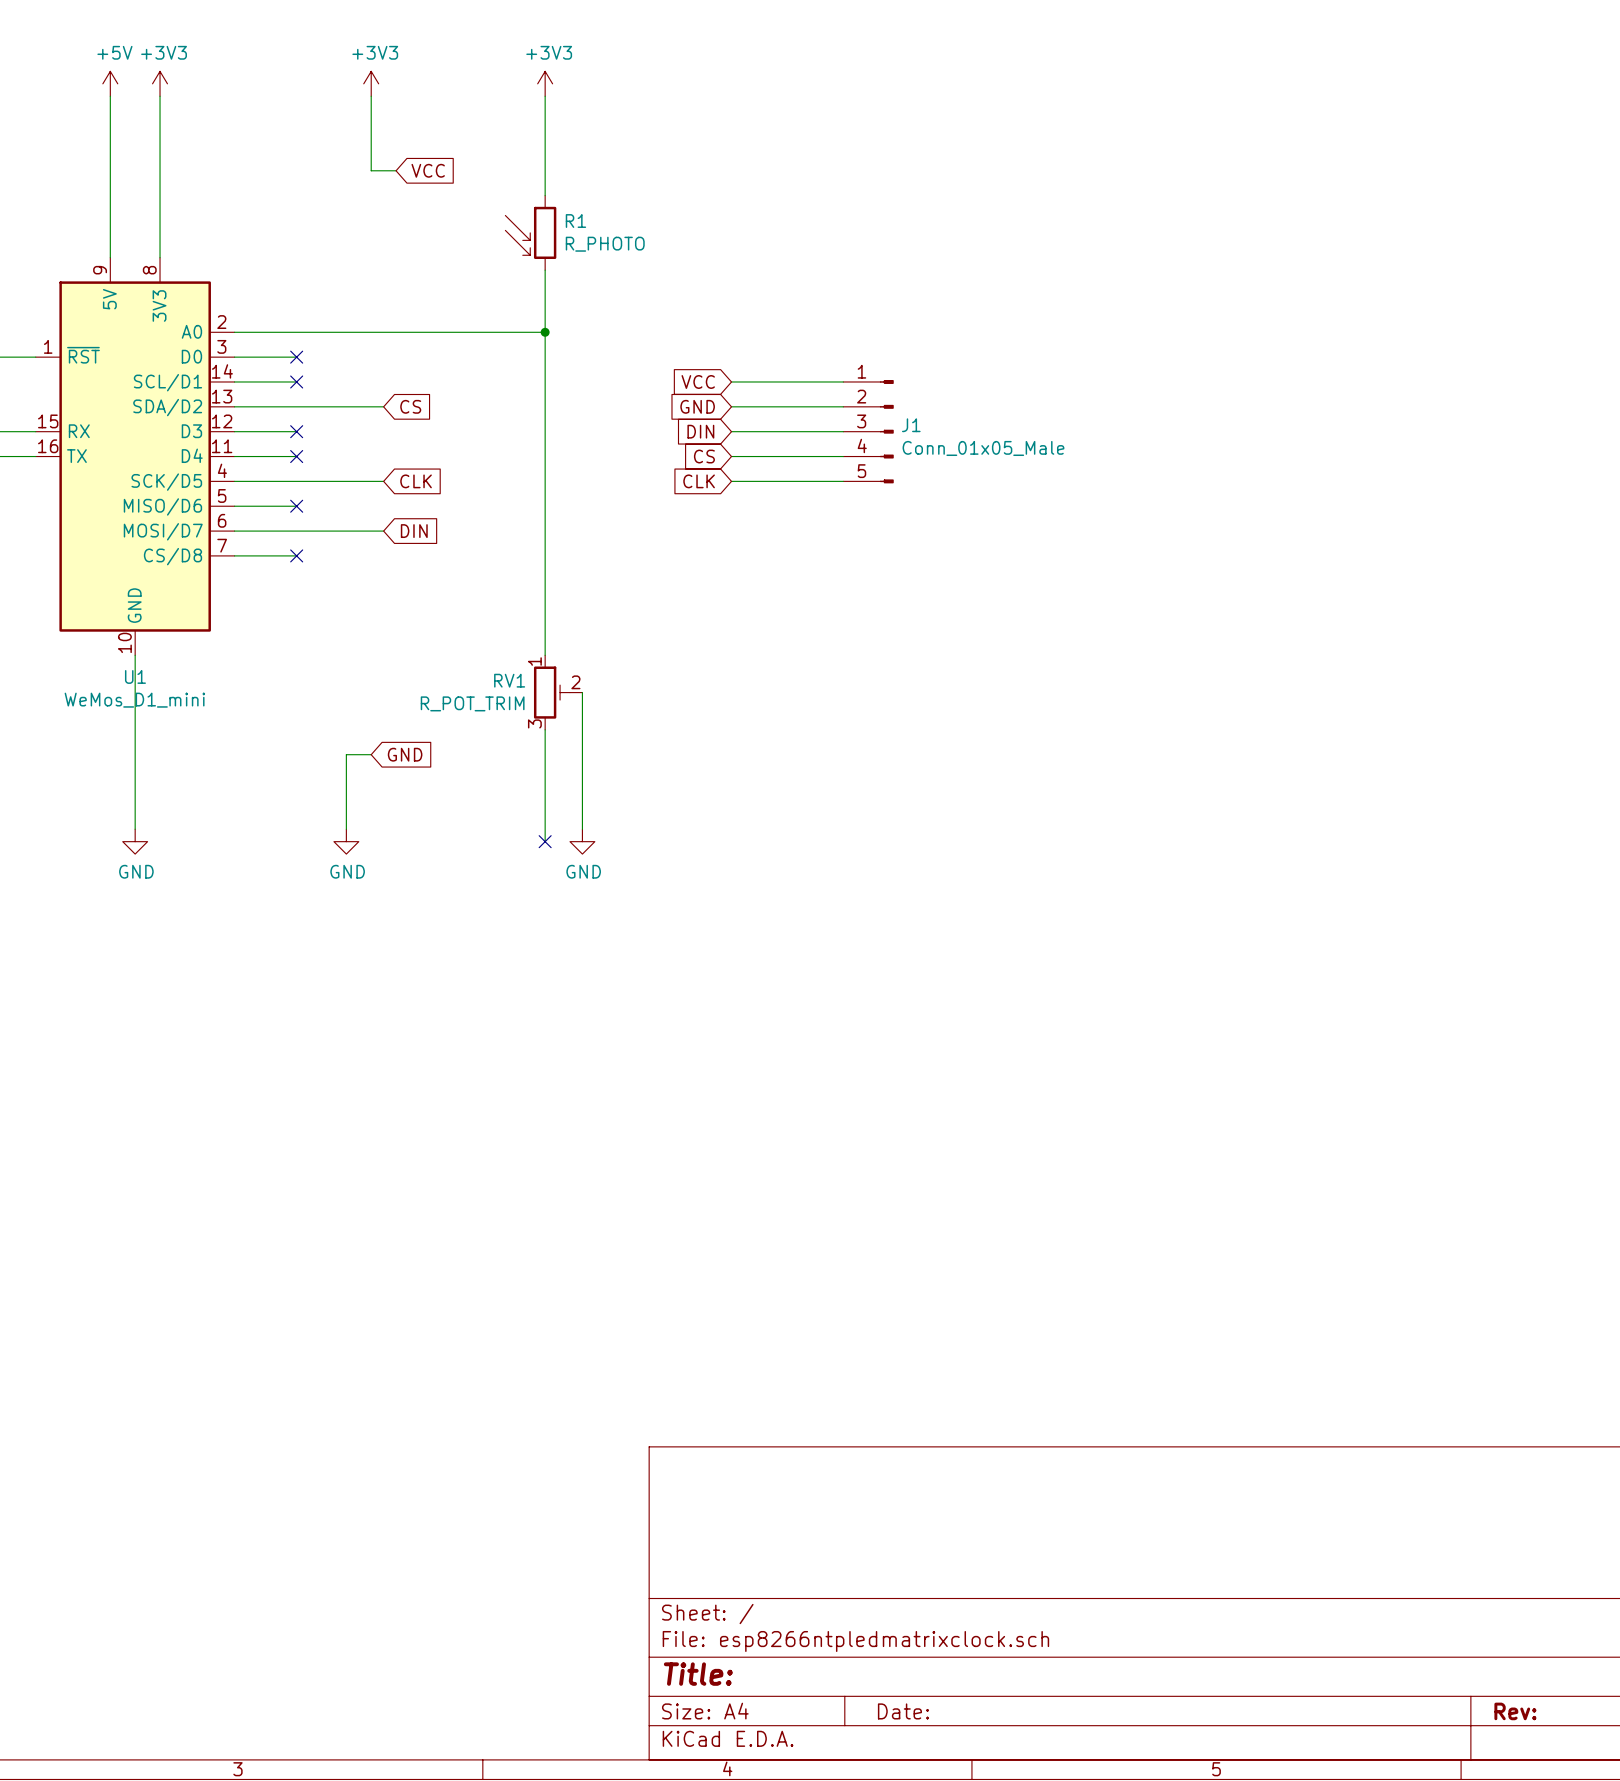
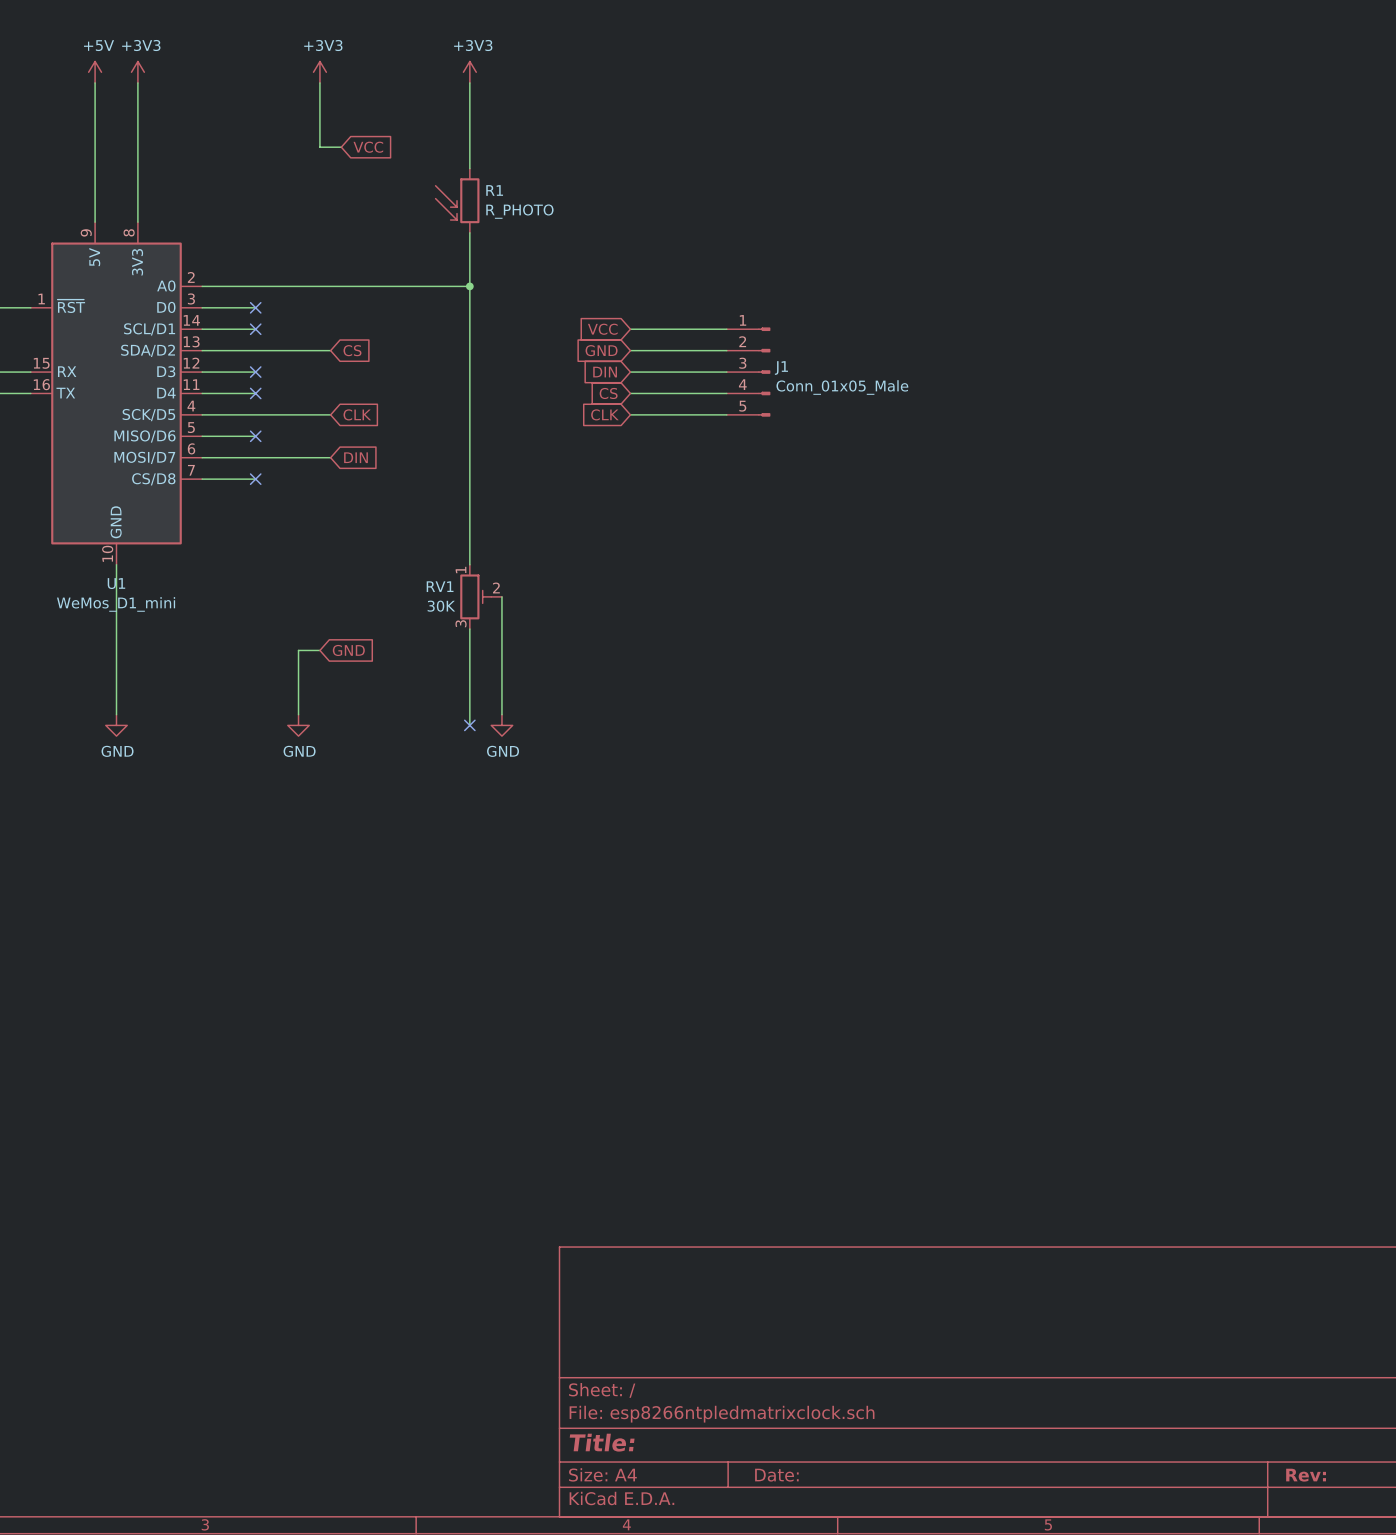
RV1 value: R_POT_TRIM (472, 703) -> 30K (441, 606)

